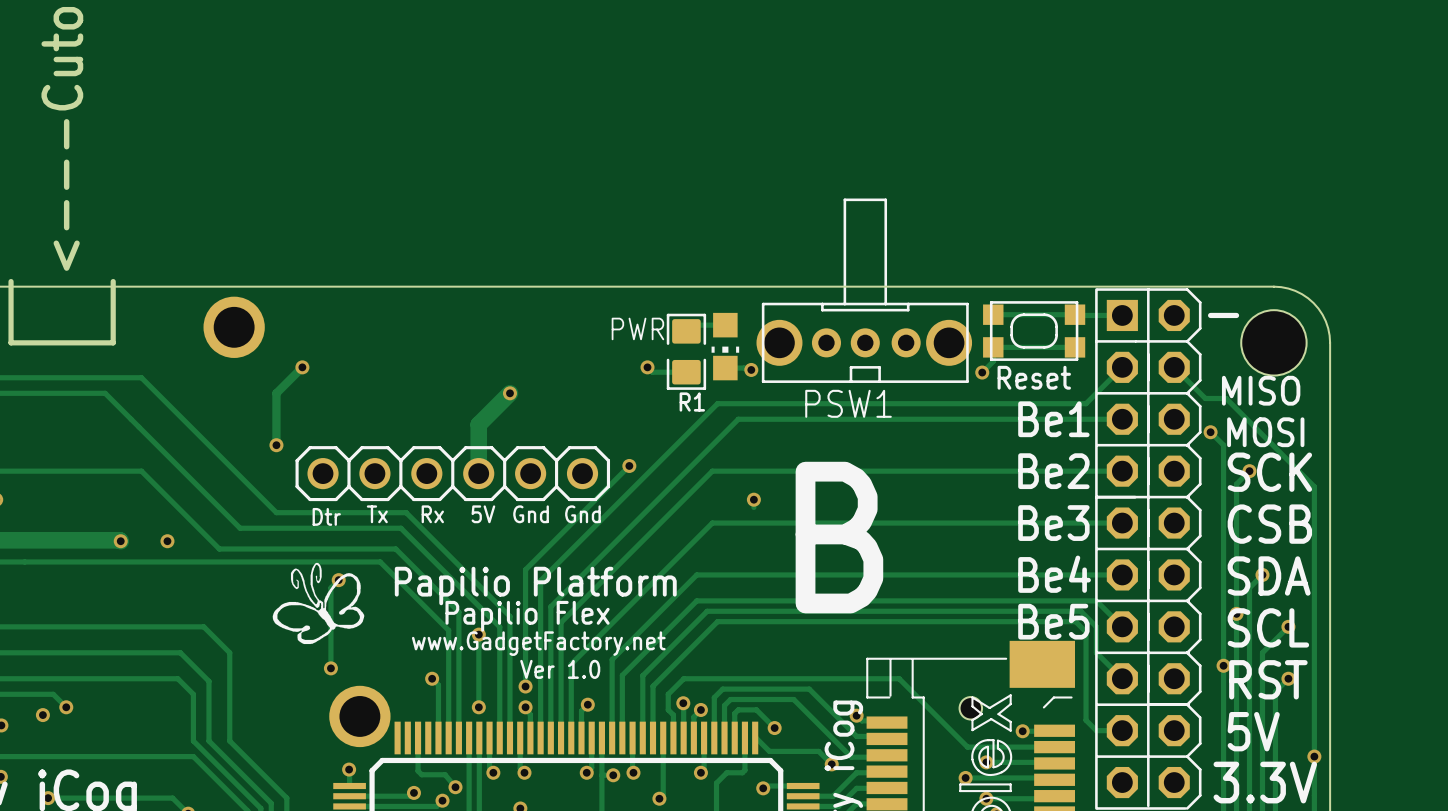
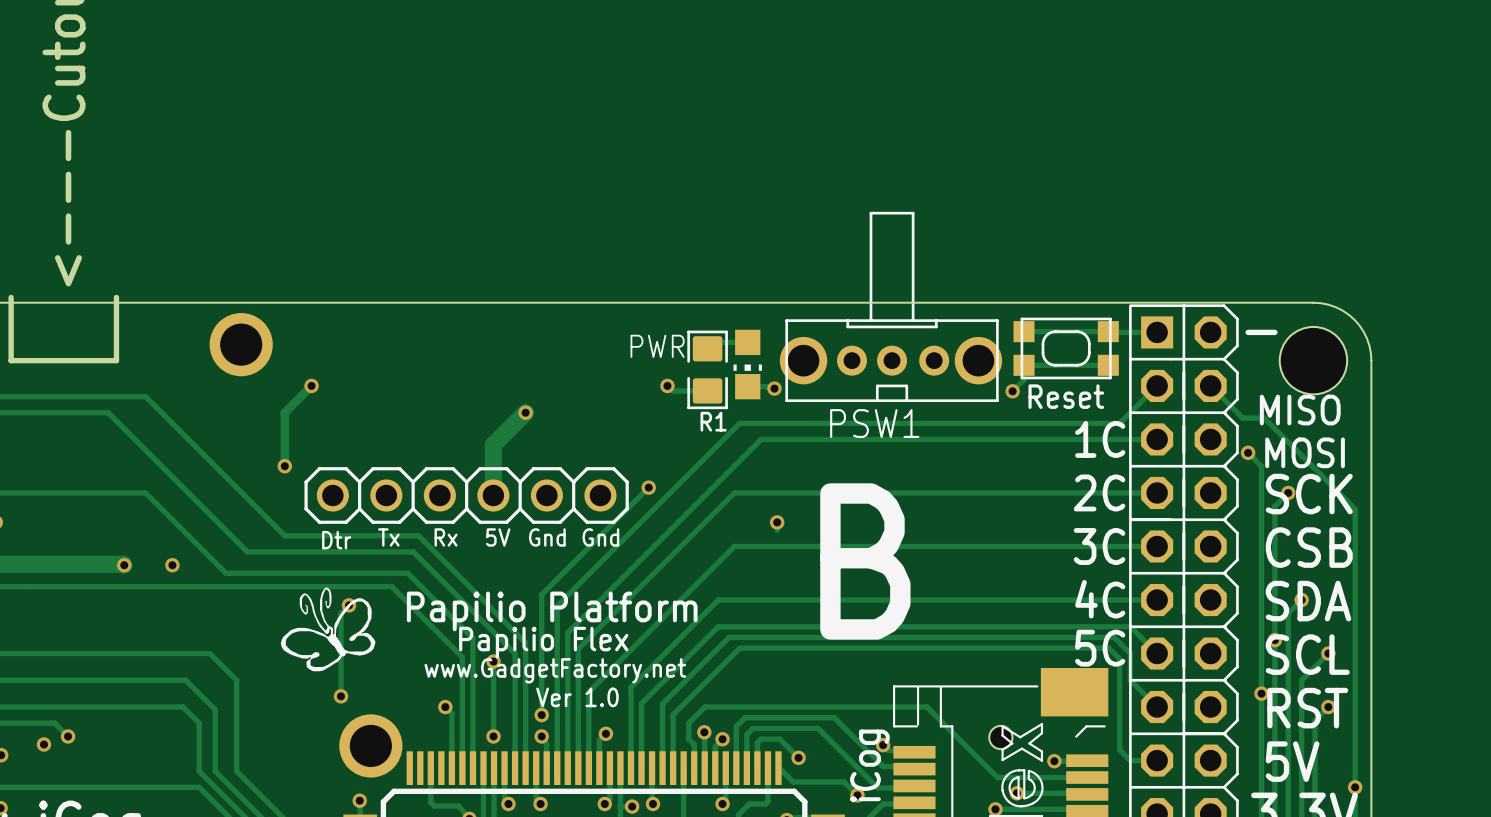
text: Be1 (1053, 419) -> none
text: none -> 1C (1100, 439)
text: Be2 (1053, 471) -> none
text: none -> 2C (1099, 492)
text: Be3 (1053, 523) -> none
text: none -> 3C (1099, 546)
text: Be4 (1054, 574) -> none
text: none -> 4C (1100, 599)
text: Be5 (1053, 621) -> none
text: none -> 5C (1100, 648)

